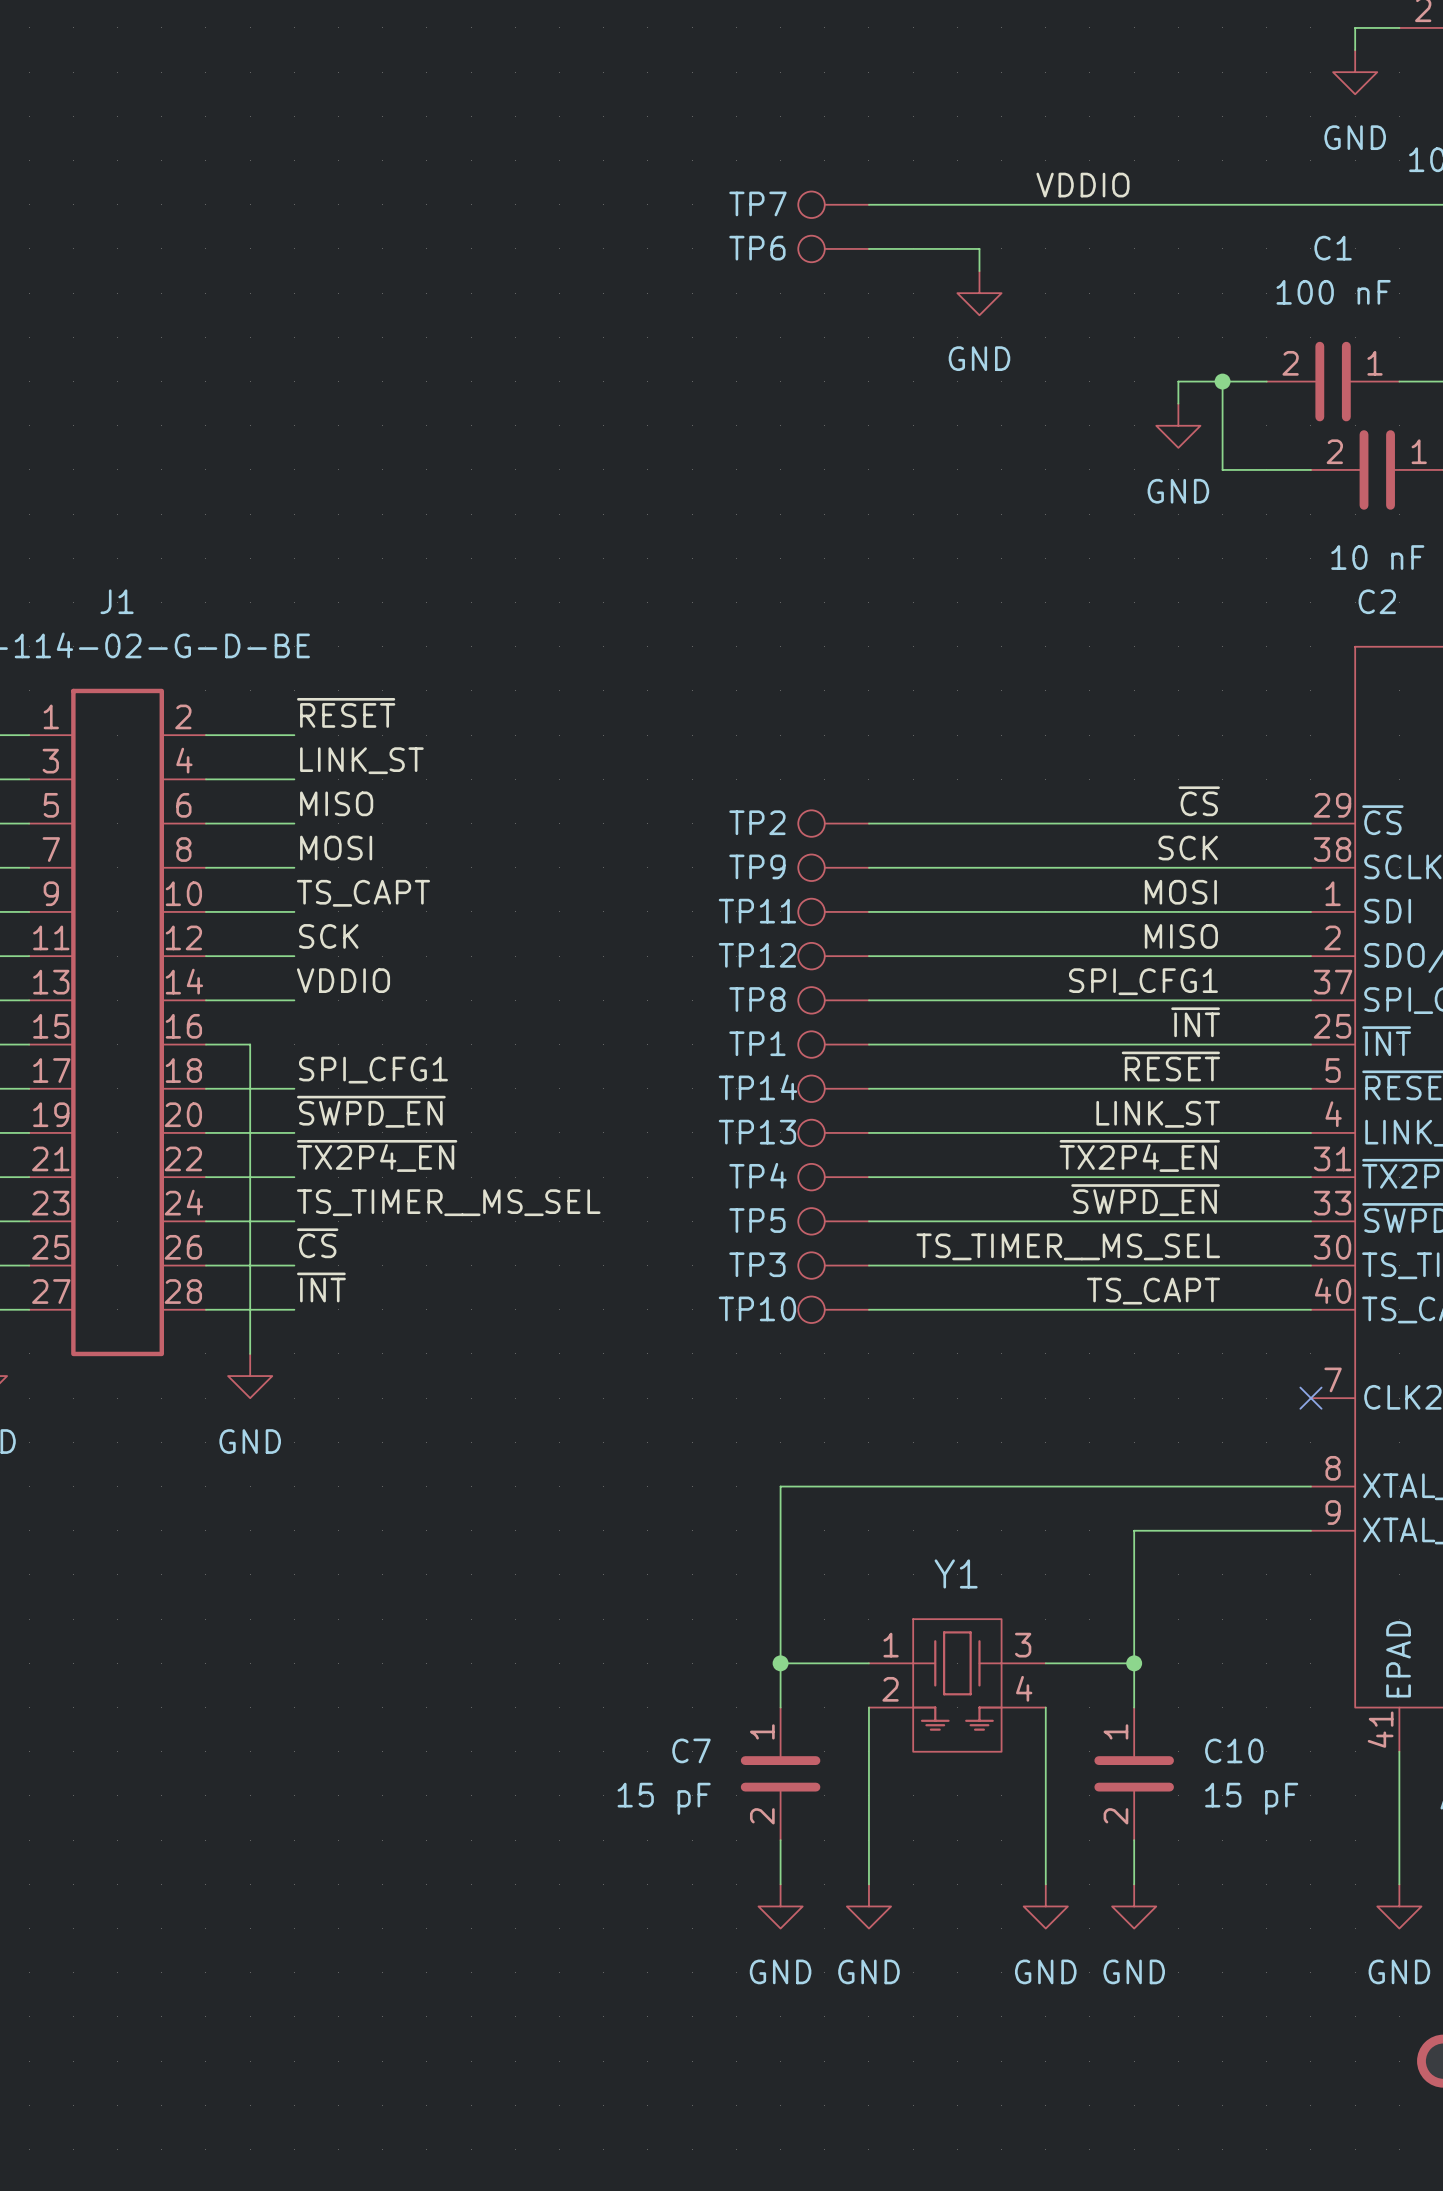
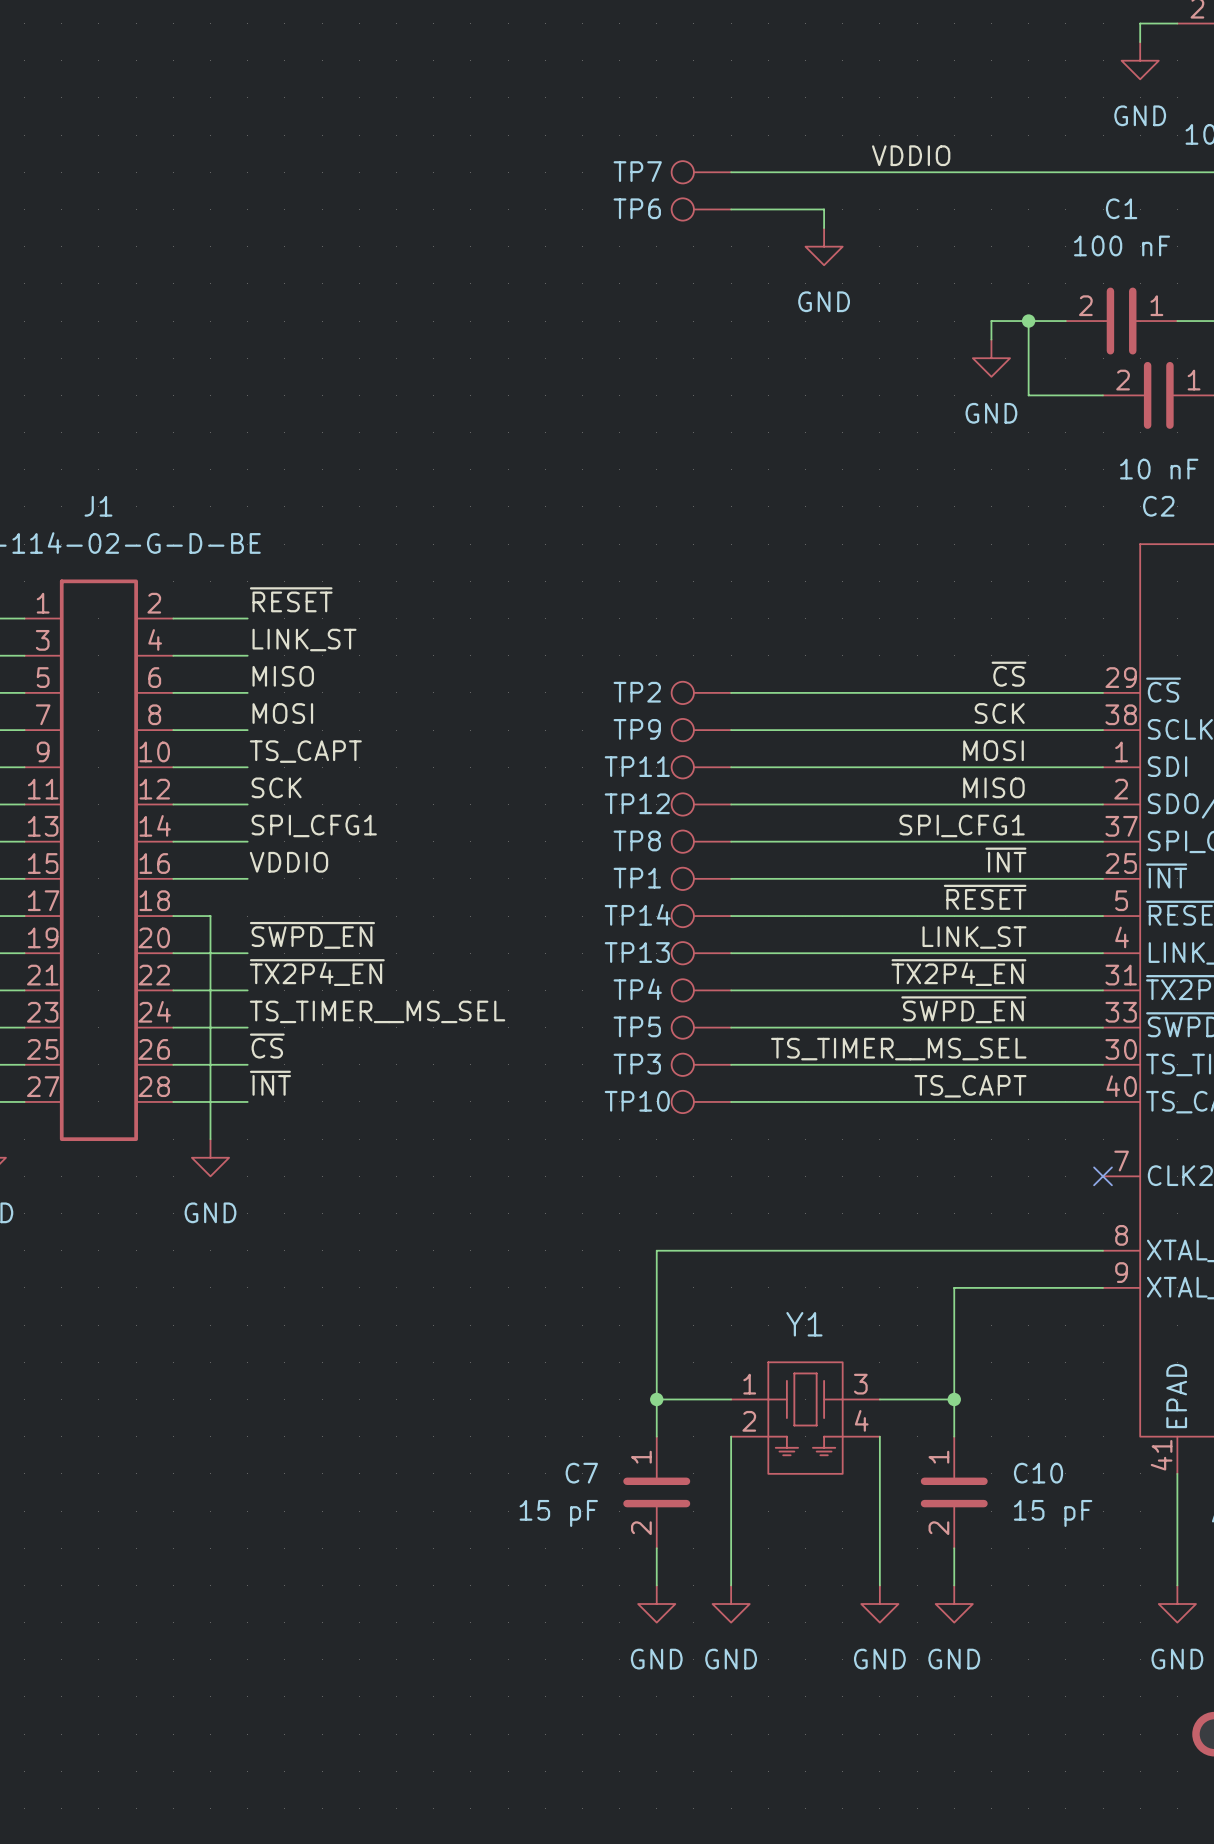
label: VDDIO (343, 980) -> SPI_CFG1 (314, 825)
label: none -> VDDIO (288, 862)
wire: (250, 1044) (250, 1088) (294, 1088) -> (210, 878) (247, 878)
label: SPI_CFG1 (373, 1070) -> none

